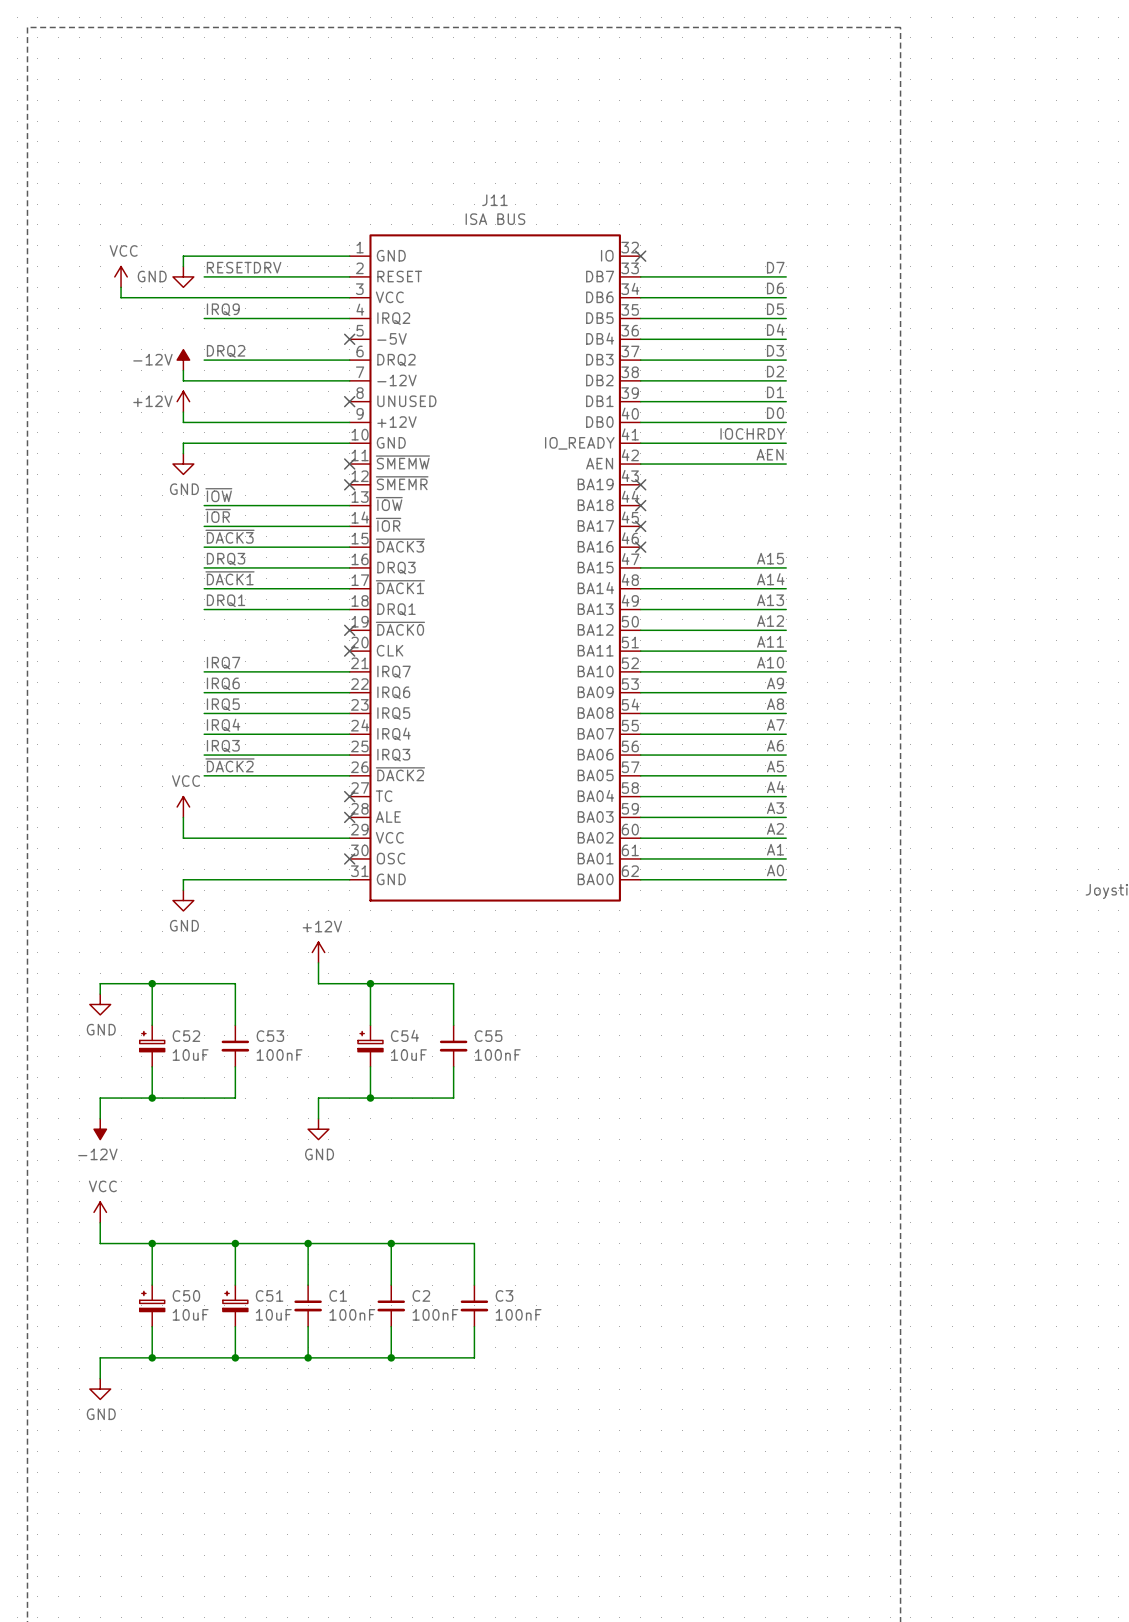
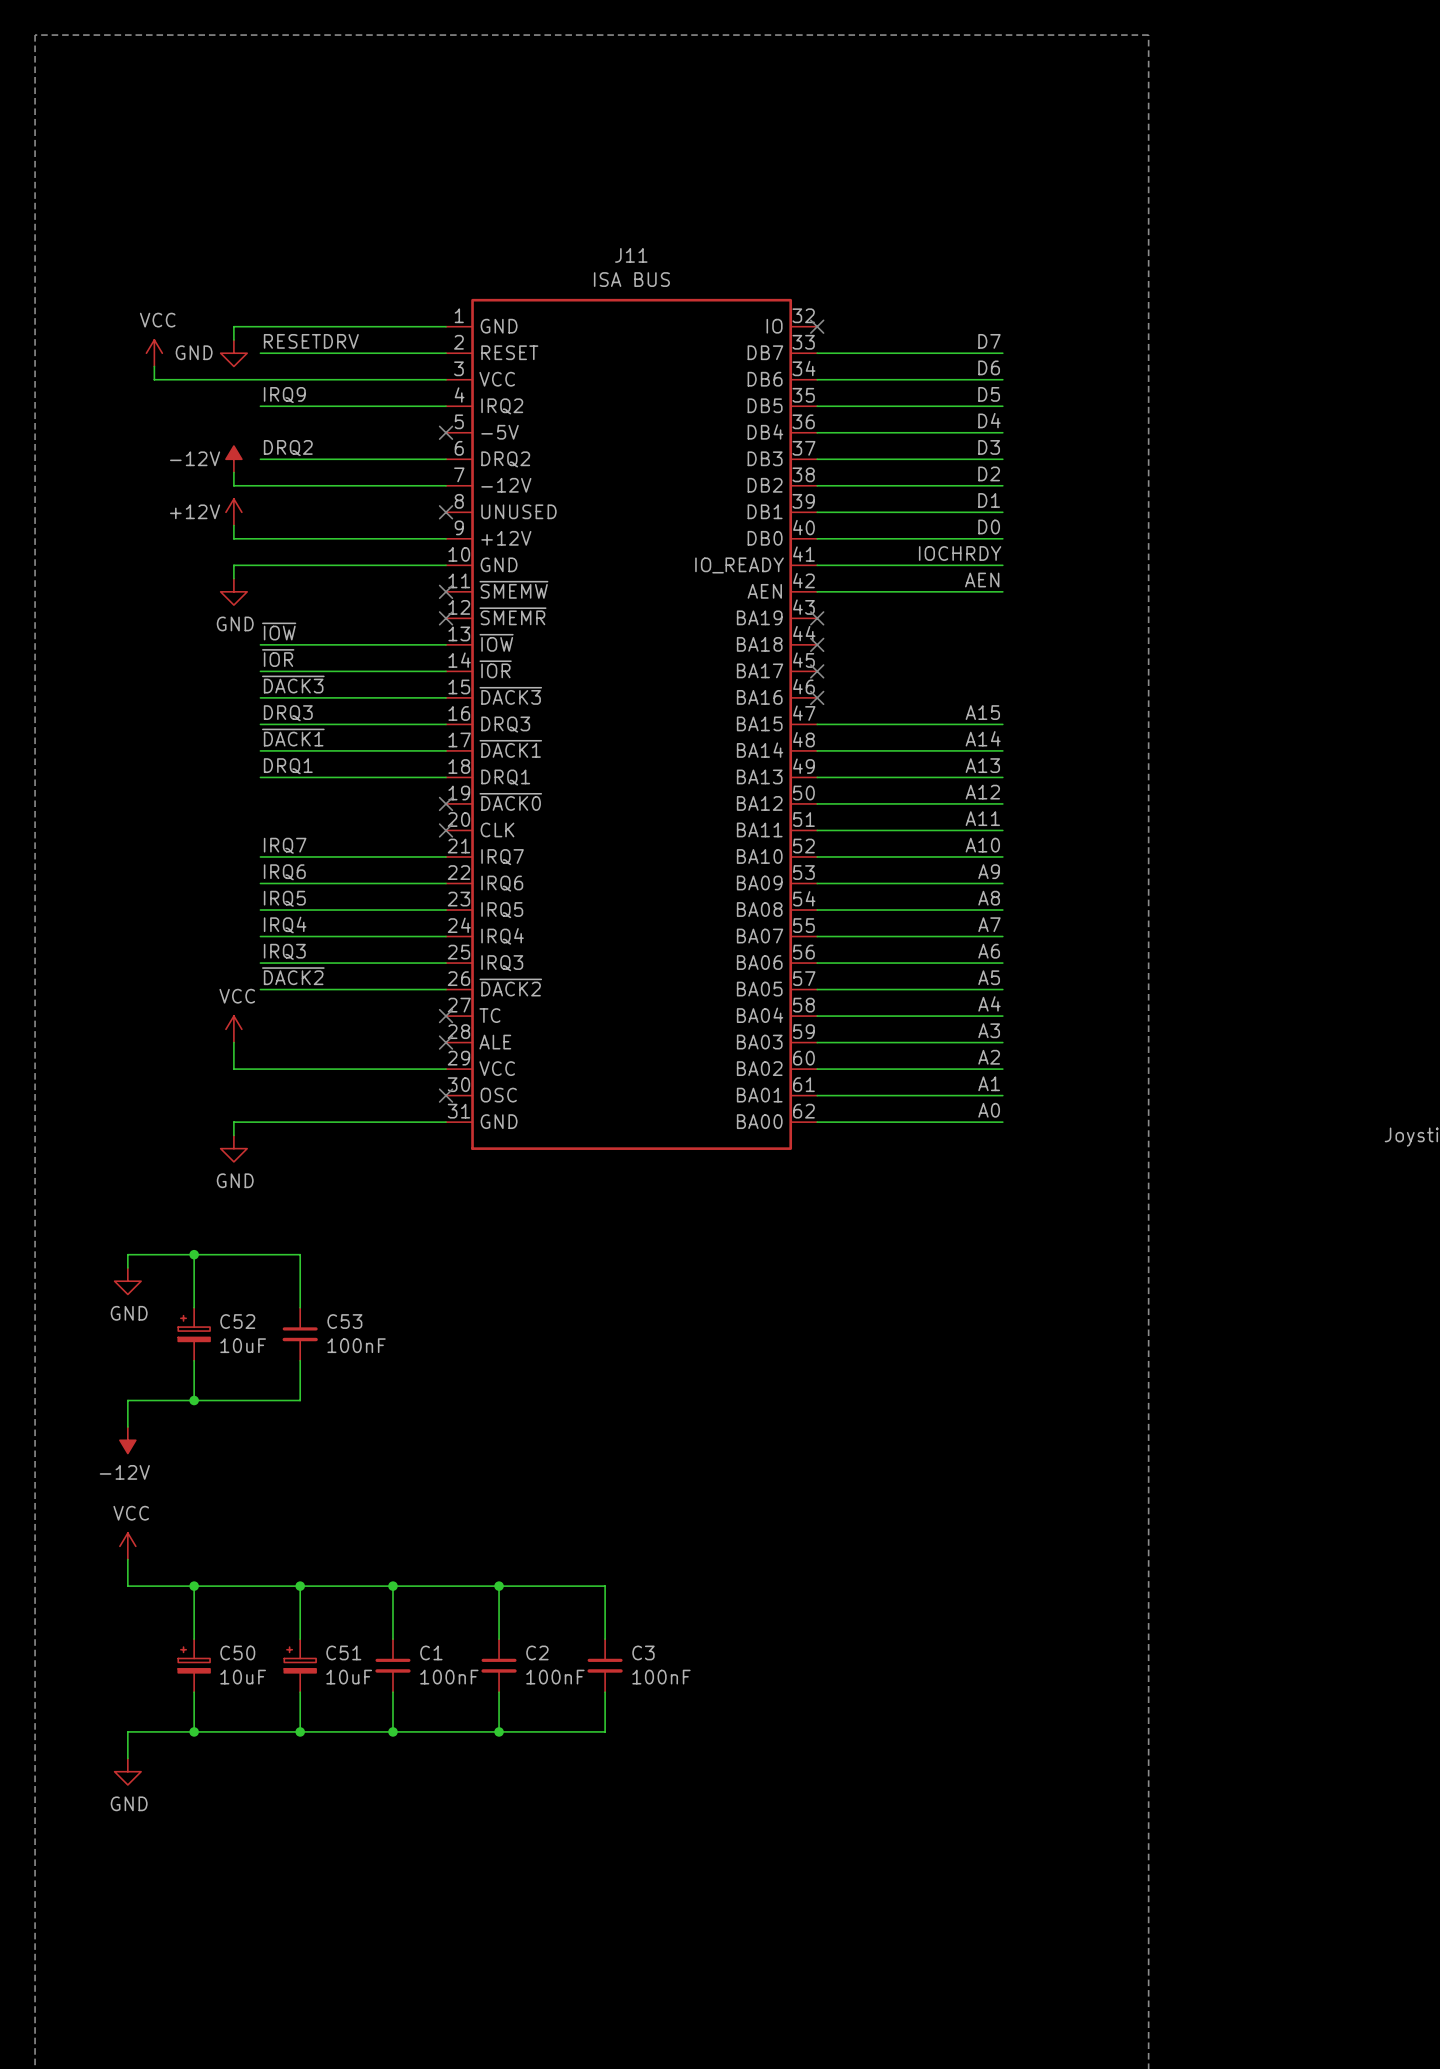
power symbol: +12V (318, 952) -> none
wire: (318, 962) (318, 983) (453, 983) (453, 1025) -> none
wire: (370, 983) (370, 1025) -> none
junction: (370, 983) -> none
C54: 10uF (370, 1046) -> none
C55: 100nF (453, 1046) -> none
wire: (370, 1066) (370, 1098) -> none
wire: (453, 1066) (453, 1098) (318, 1098) (318, 1118) -> none
junction: (370, 1098) -> none
power symbol: GND (318, 1129) -> none

